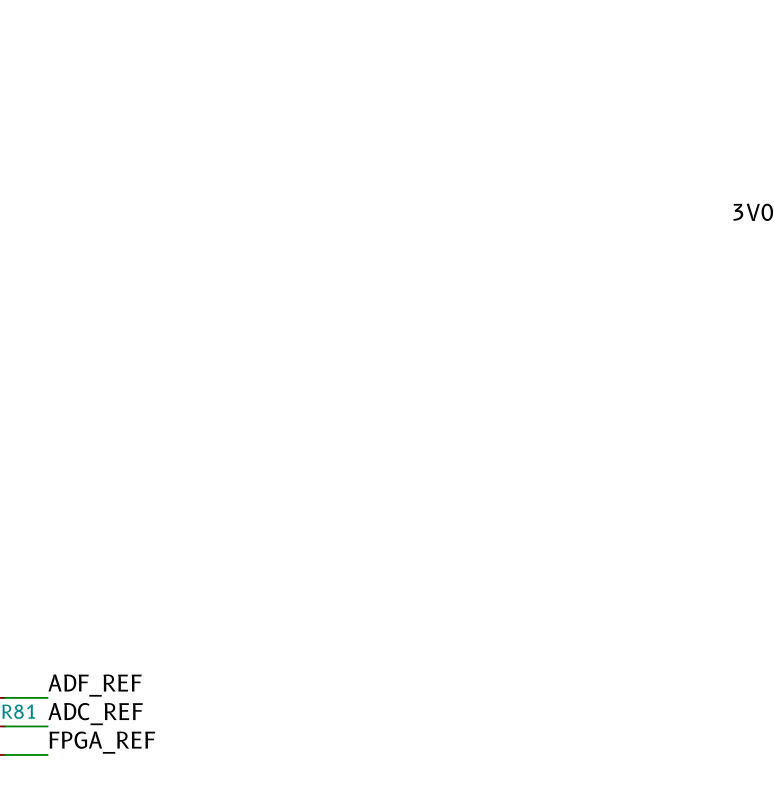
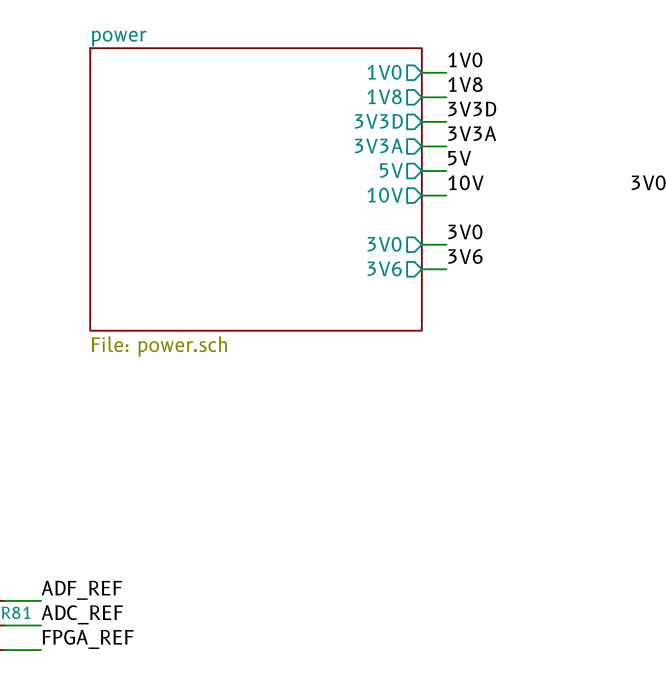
label: none -> 1V0 (465, 59)
sheet pin: none -> 1V0 (384, 72)
wire: none -> (421, 72) (446, 72)
label: none -> 1V8 (465, 84)
sheet pin: none -> 1V8 (384, 96)
wire: none -> (421, 97) (446, 97)
label: none -> 3V3D (472, 109)
sheet pin: none -> 3V3D (378, 121)
wire: none -> (421, 121) (446, 121)
label: none -> 3V3A (472, 133)
sheet pin: none -> 3V3A (378, 146)
wire: none -> (421, 146) (446, 146)
label: none -> 5V (459, 158)
sheet pin: none -> 5V (391, 170)
wire: none -> (421, 171) (446, 171)
label: none -> 10V (465, 182)
sheet power: none -> File: power.sch (256, 189)
sheet pin: none -> 10V (385, 195)
wire: none -> (421, 195) (446, 195)
label: none -> 3V0 (465, 231)
sheet pin: none -> 3V0 (384, 244)
wire: none -> (421, 244) (446, 244)
label: none -> 3V6 (465, 256)
sheet pin: none -> 3V6 (384, 268)
wire: none -> (421, 269) (446, 269)

